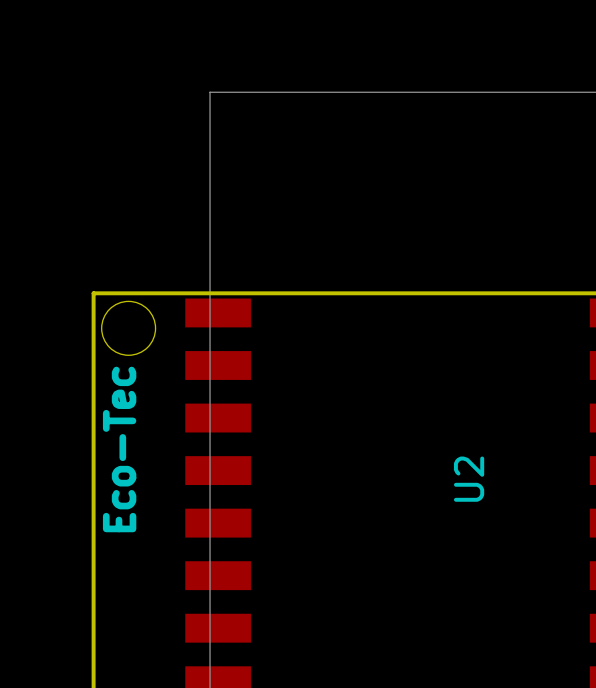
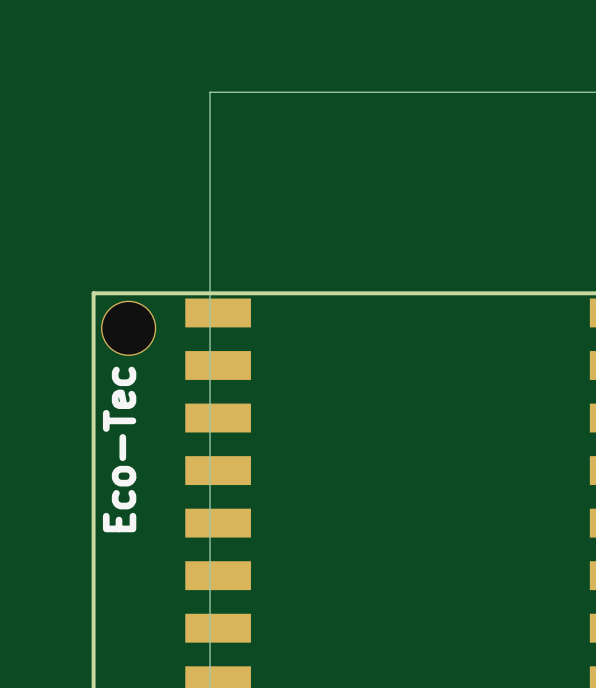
U2 name: U2 (469, 479) -> none

